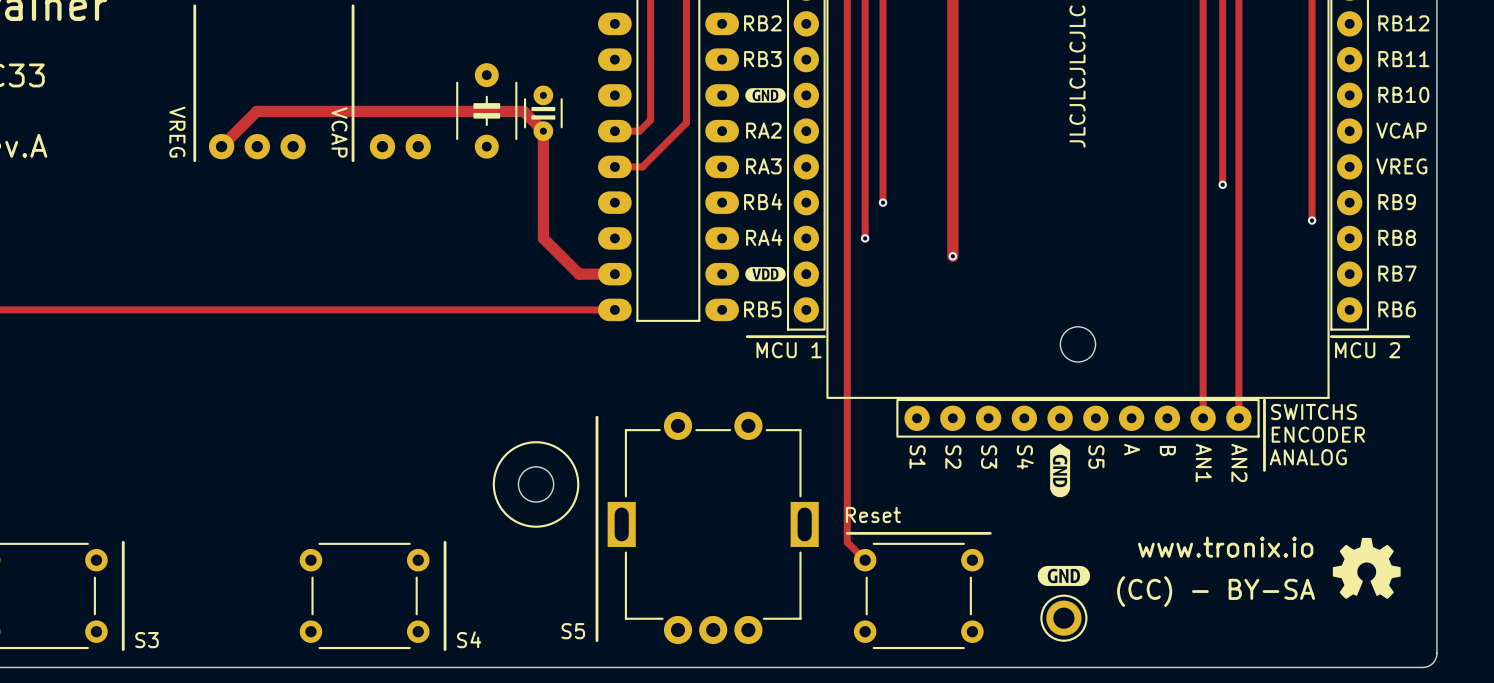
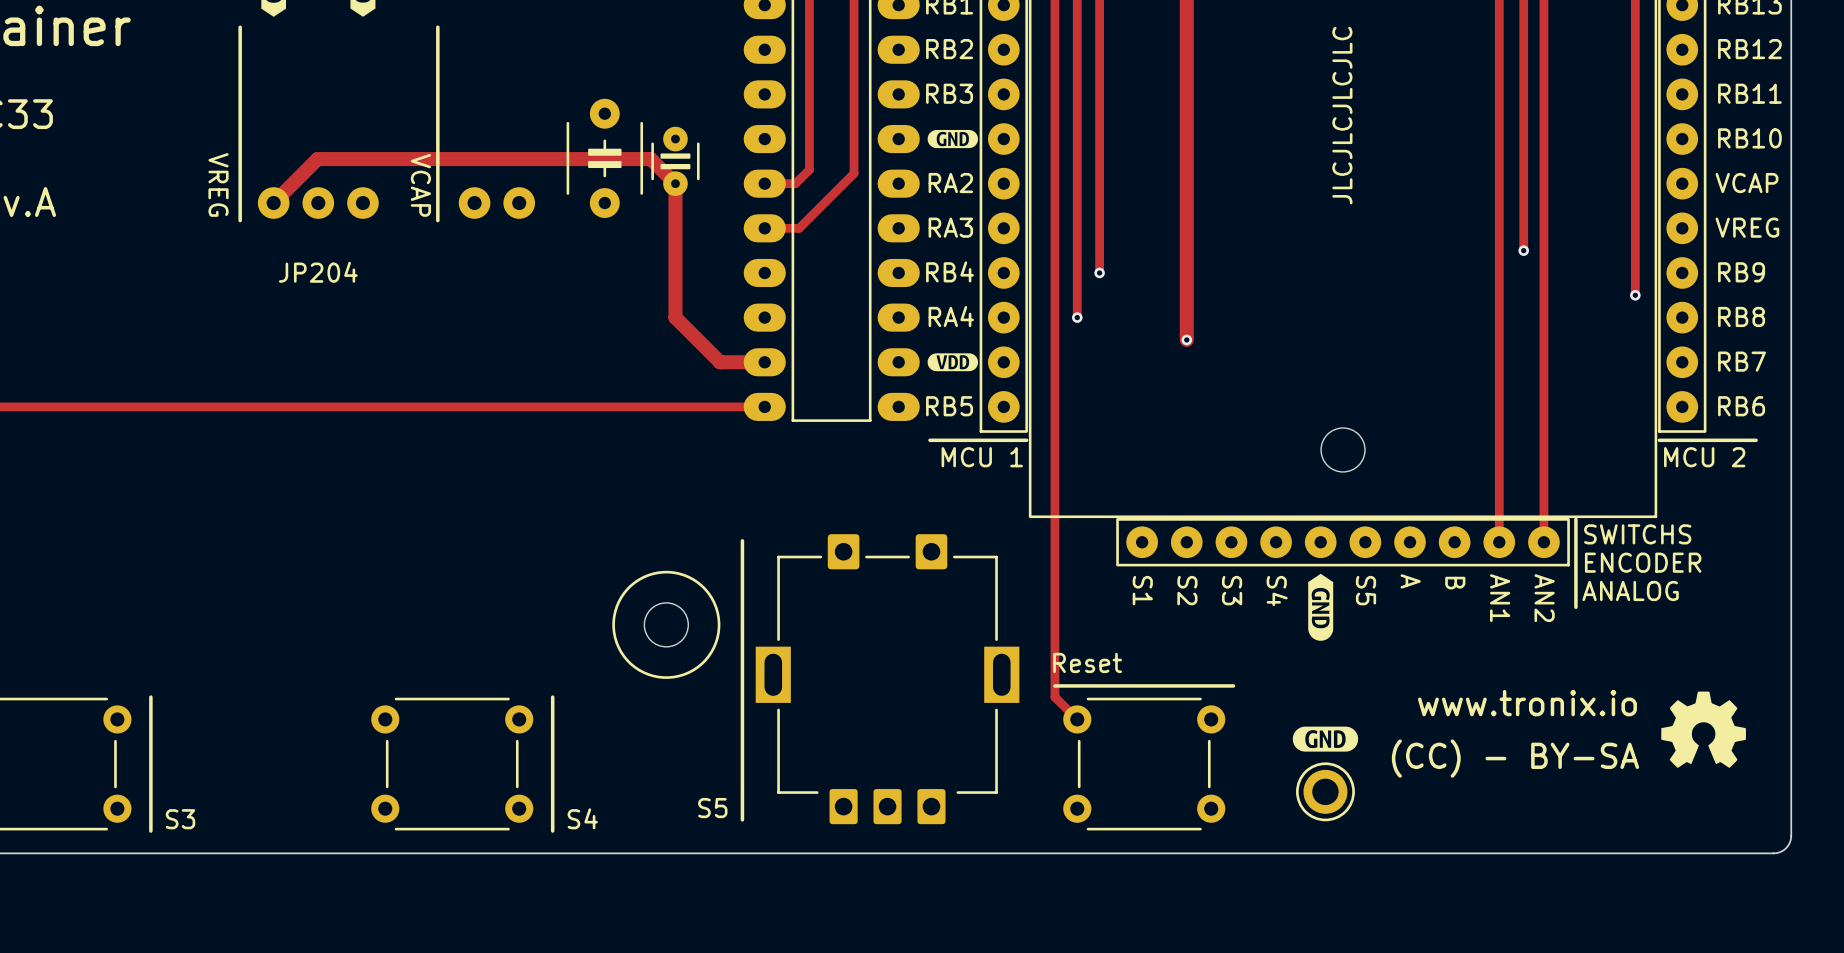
JP204 name: none -> JP204 (318, 272)
part footprint: [607, 411, 819, 645] -> [755, 534, 1020, 825]

